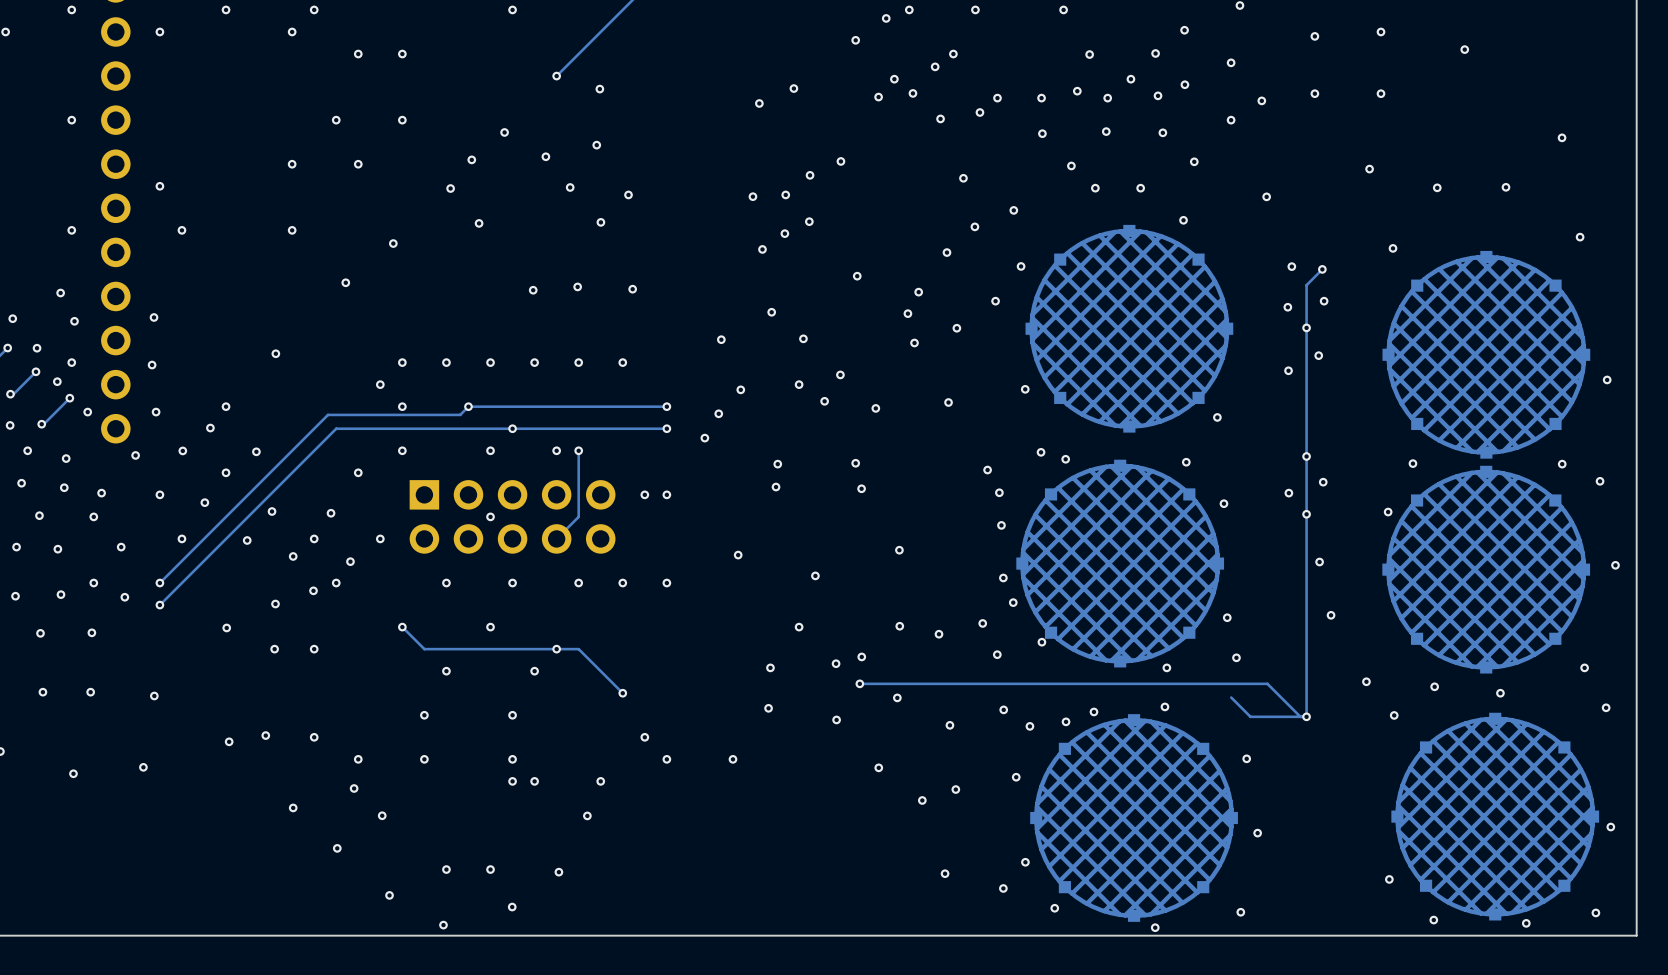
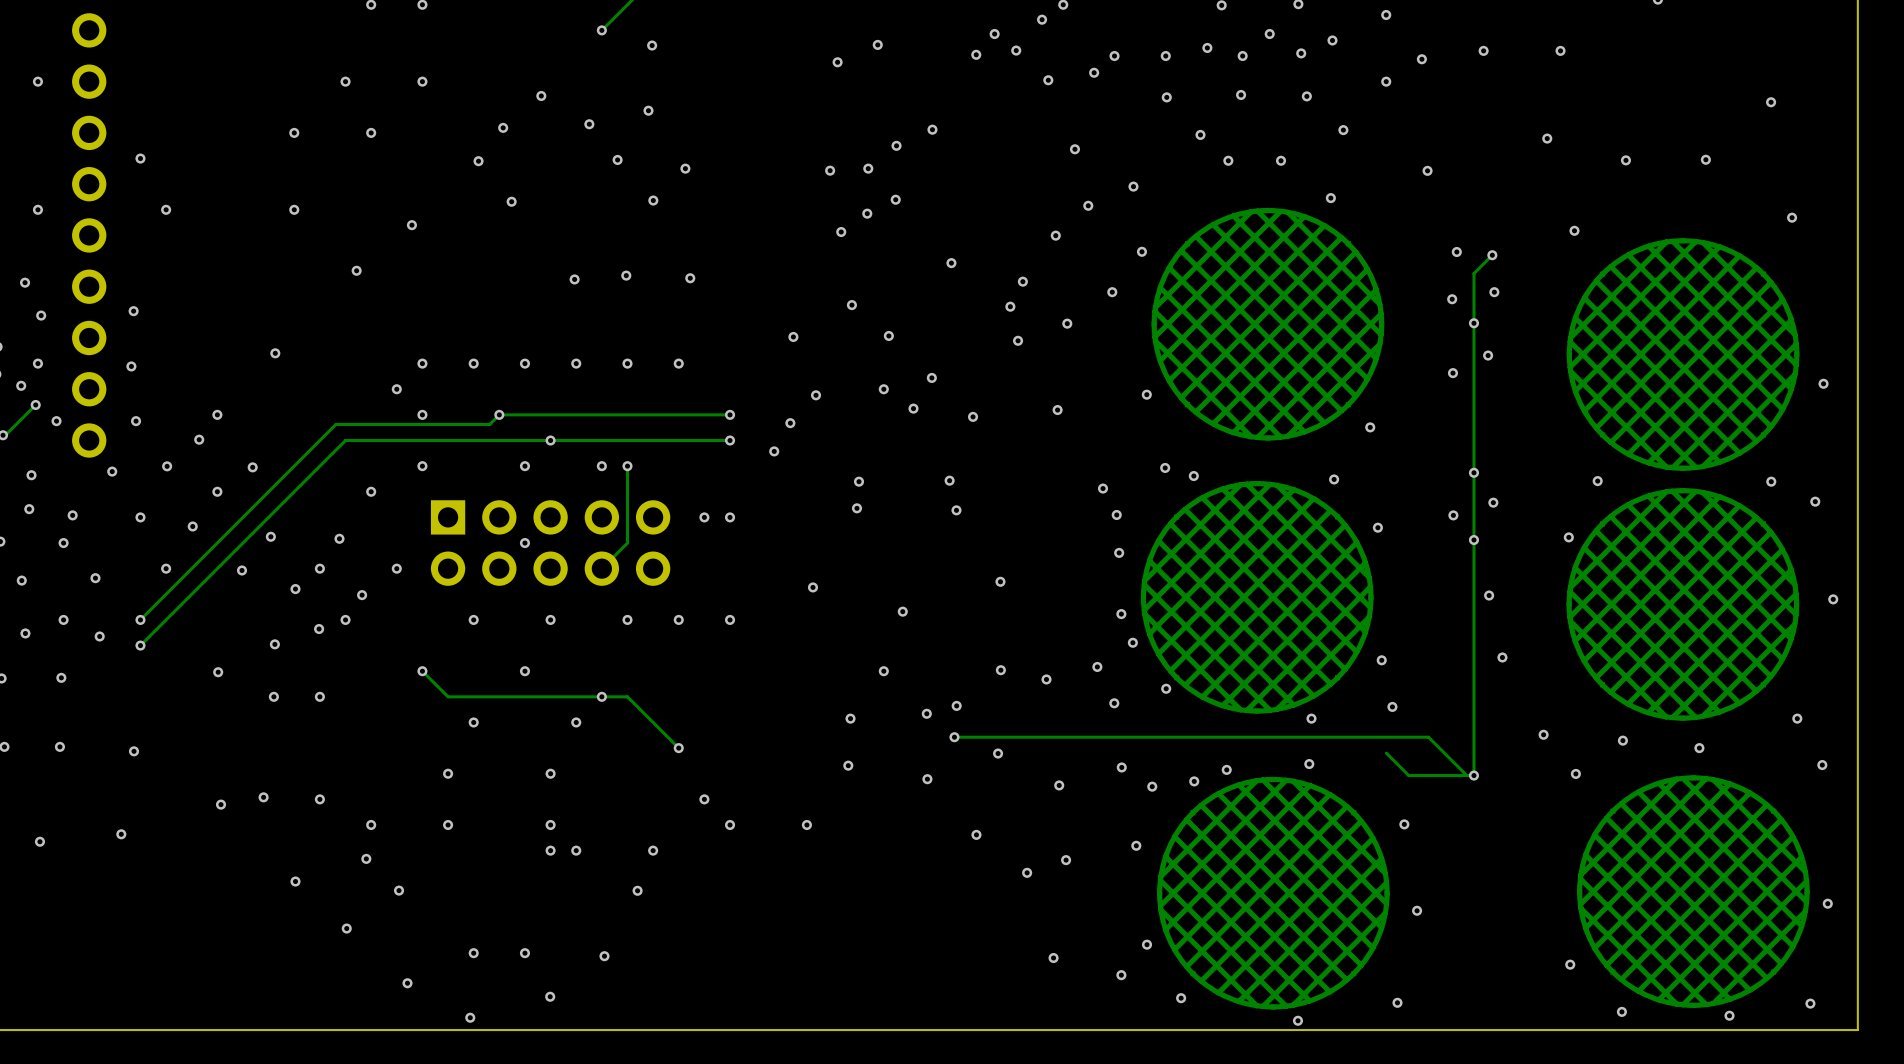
part footprint: [1025, 224, 1234, 433] -> [1151, 207, 1385, 441]
part footprint: [1382, 250, 1591, 459] -> [1566, 238, 1800, 471]
part footprint: [1016, 459, 1225, 668] -> [1140, 481, 1374, 714]
part footprint: [1382, 465, 1591, 674] -> [1566, 488, 1800, 721]
part footprint: [1391, 712, 1600, 921] -> [1577, 775, 1810, 1008]
part footprint: [1030, 714, 1238, 922] -> [1157, 776, 1390, 1010]

